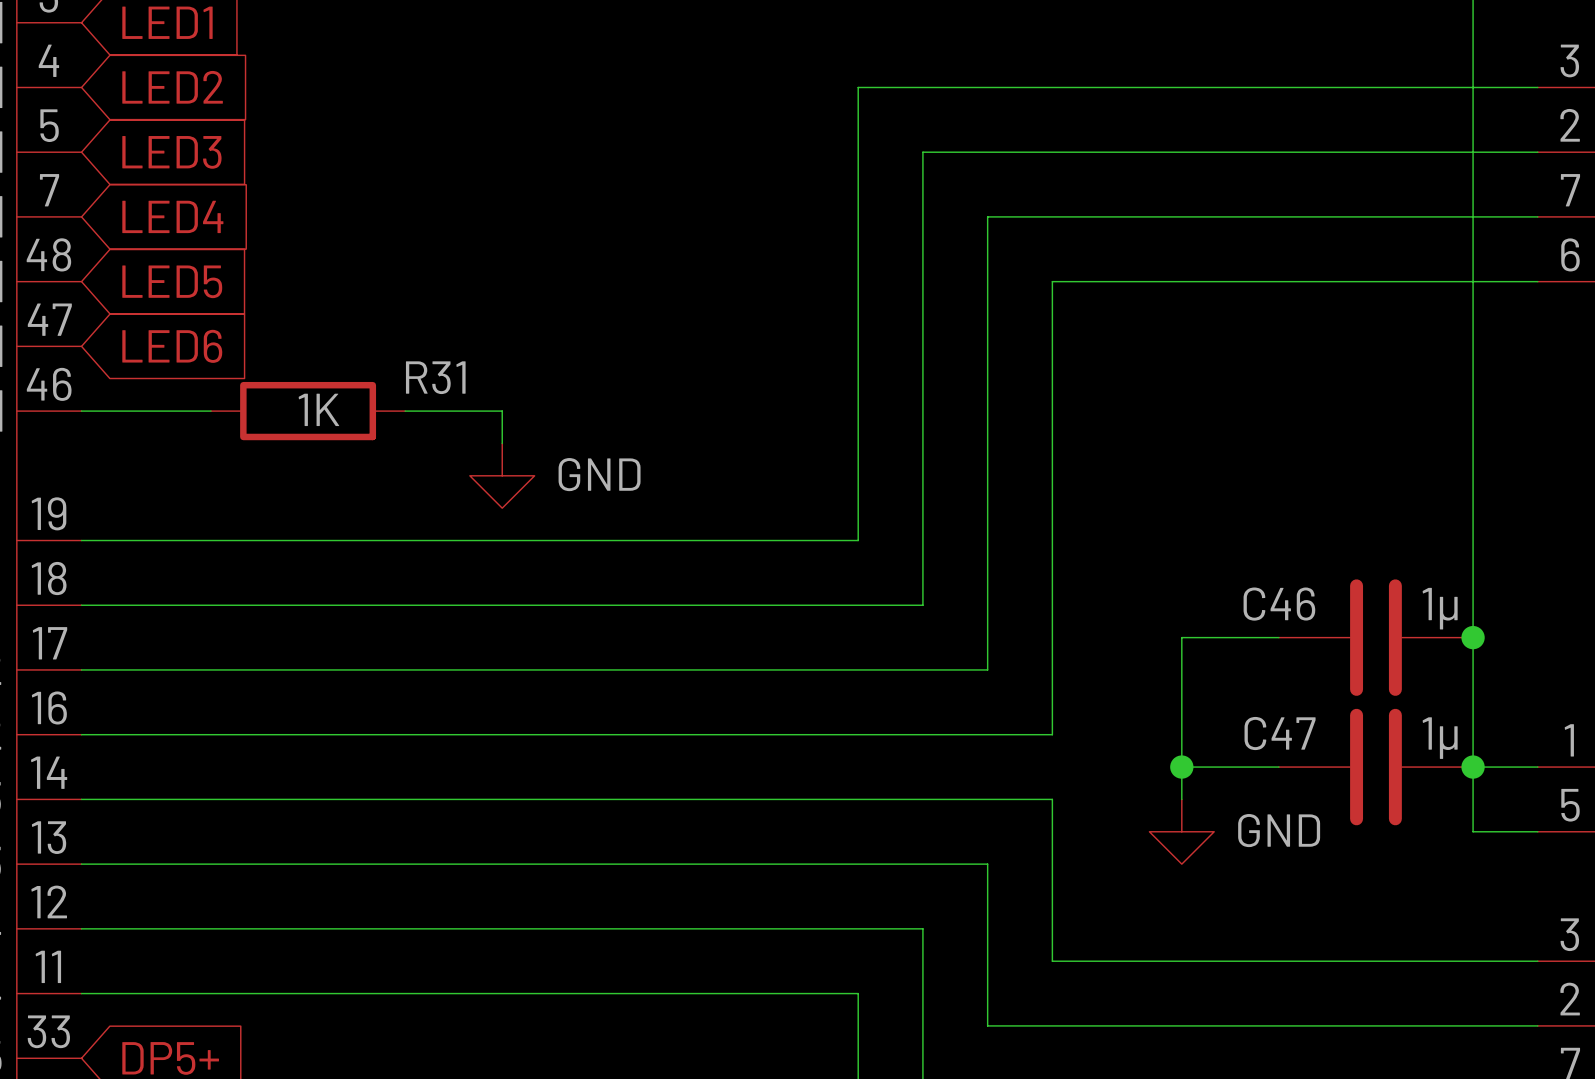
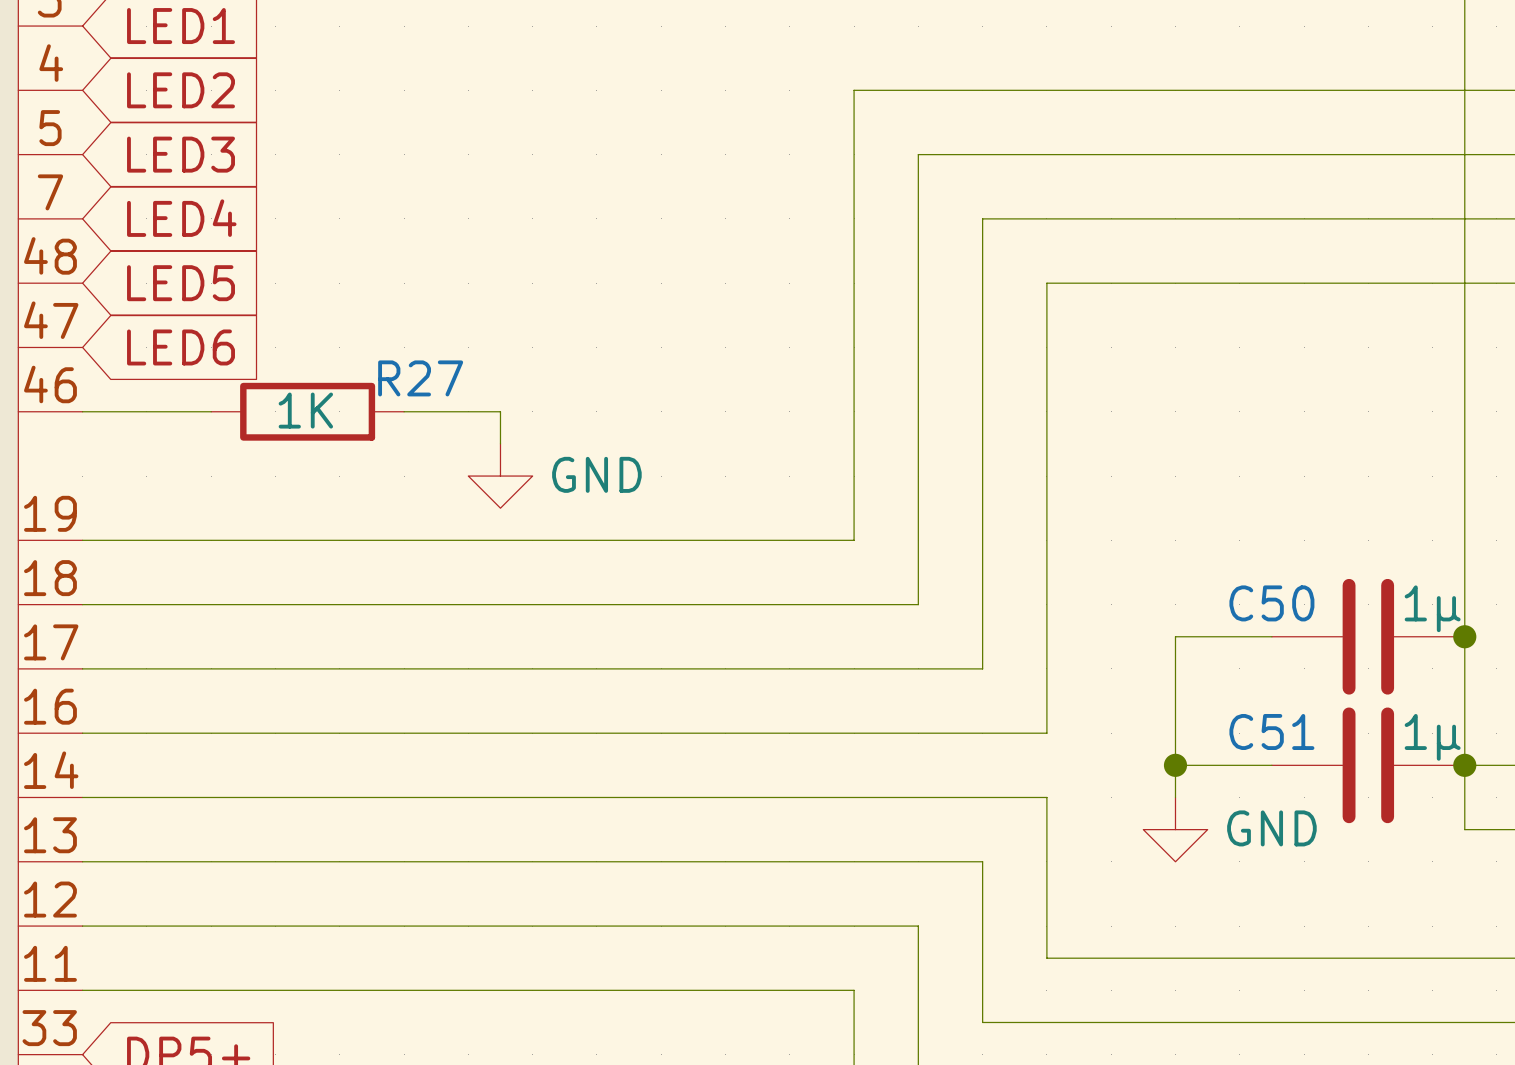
R31 name: R31 (435, 377) -> R27 (420, 378)
C46 name: C46 (1279, 604) -> C50 (1271, 603)
C47 name: C47 (1280, 733) -> C51 (1271, 731)

